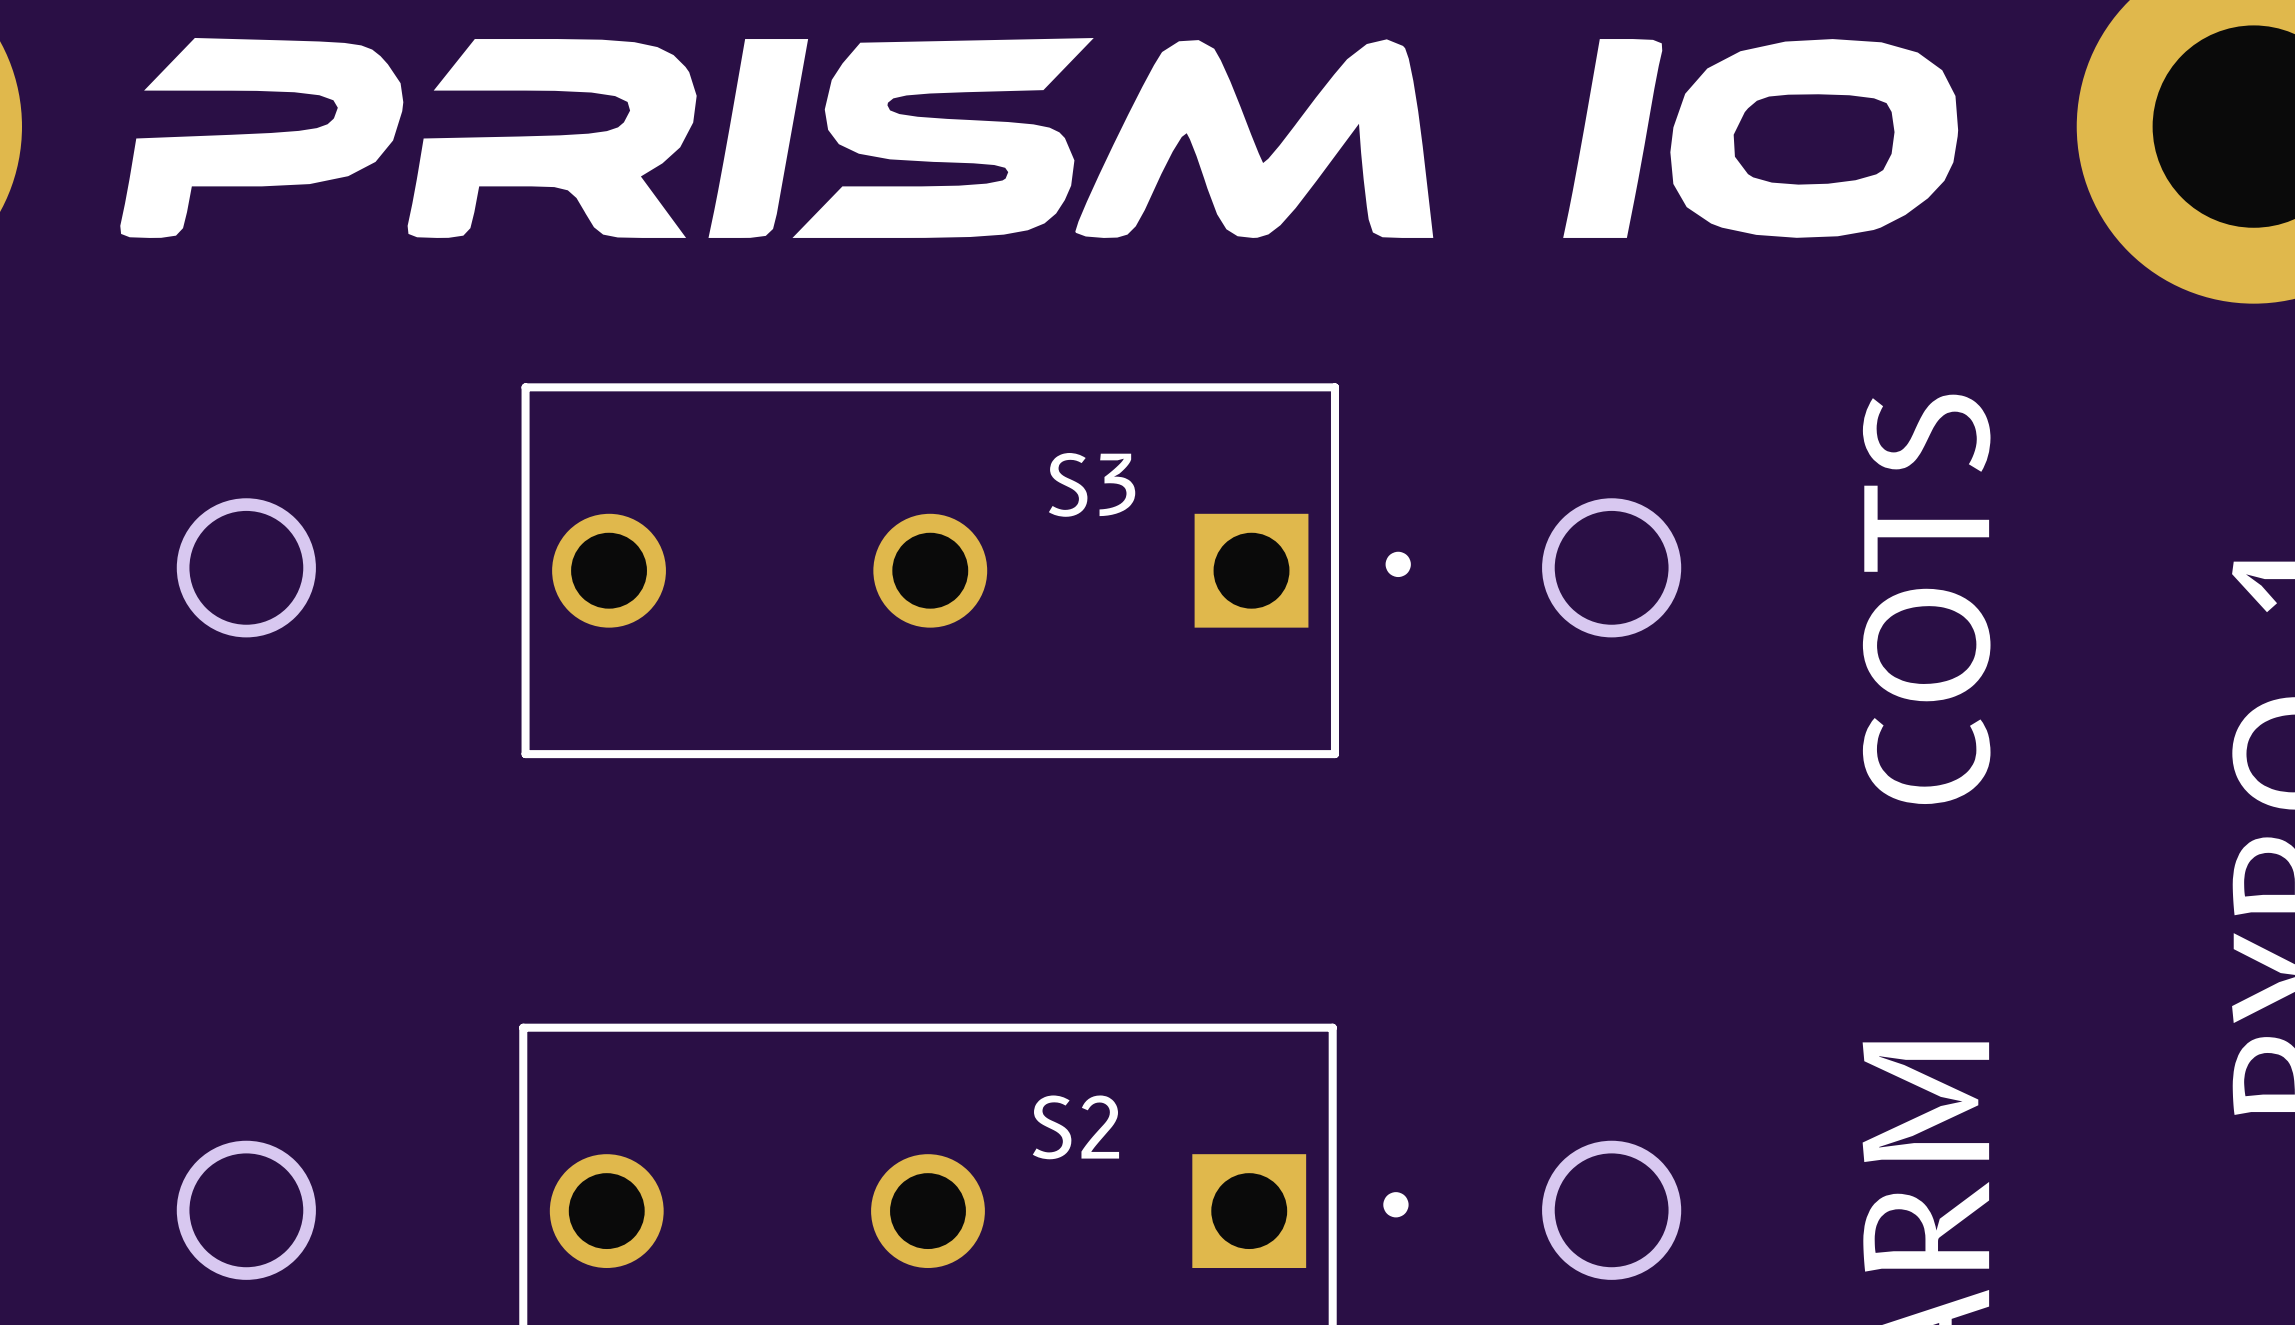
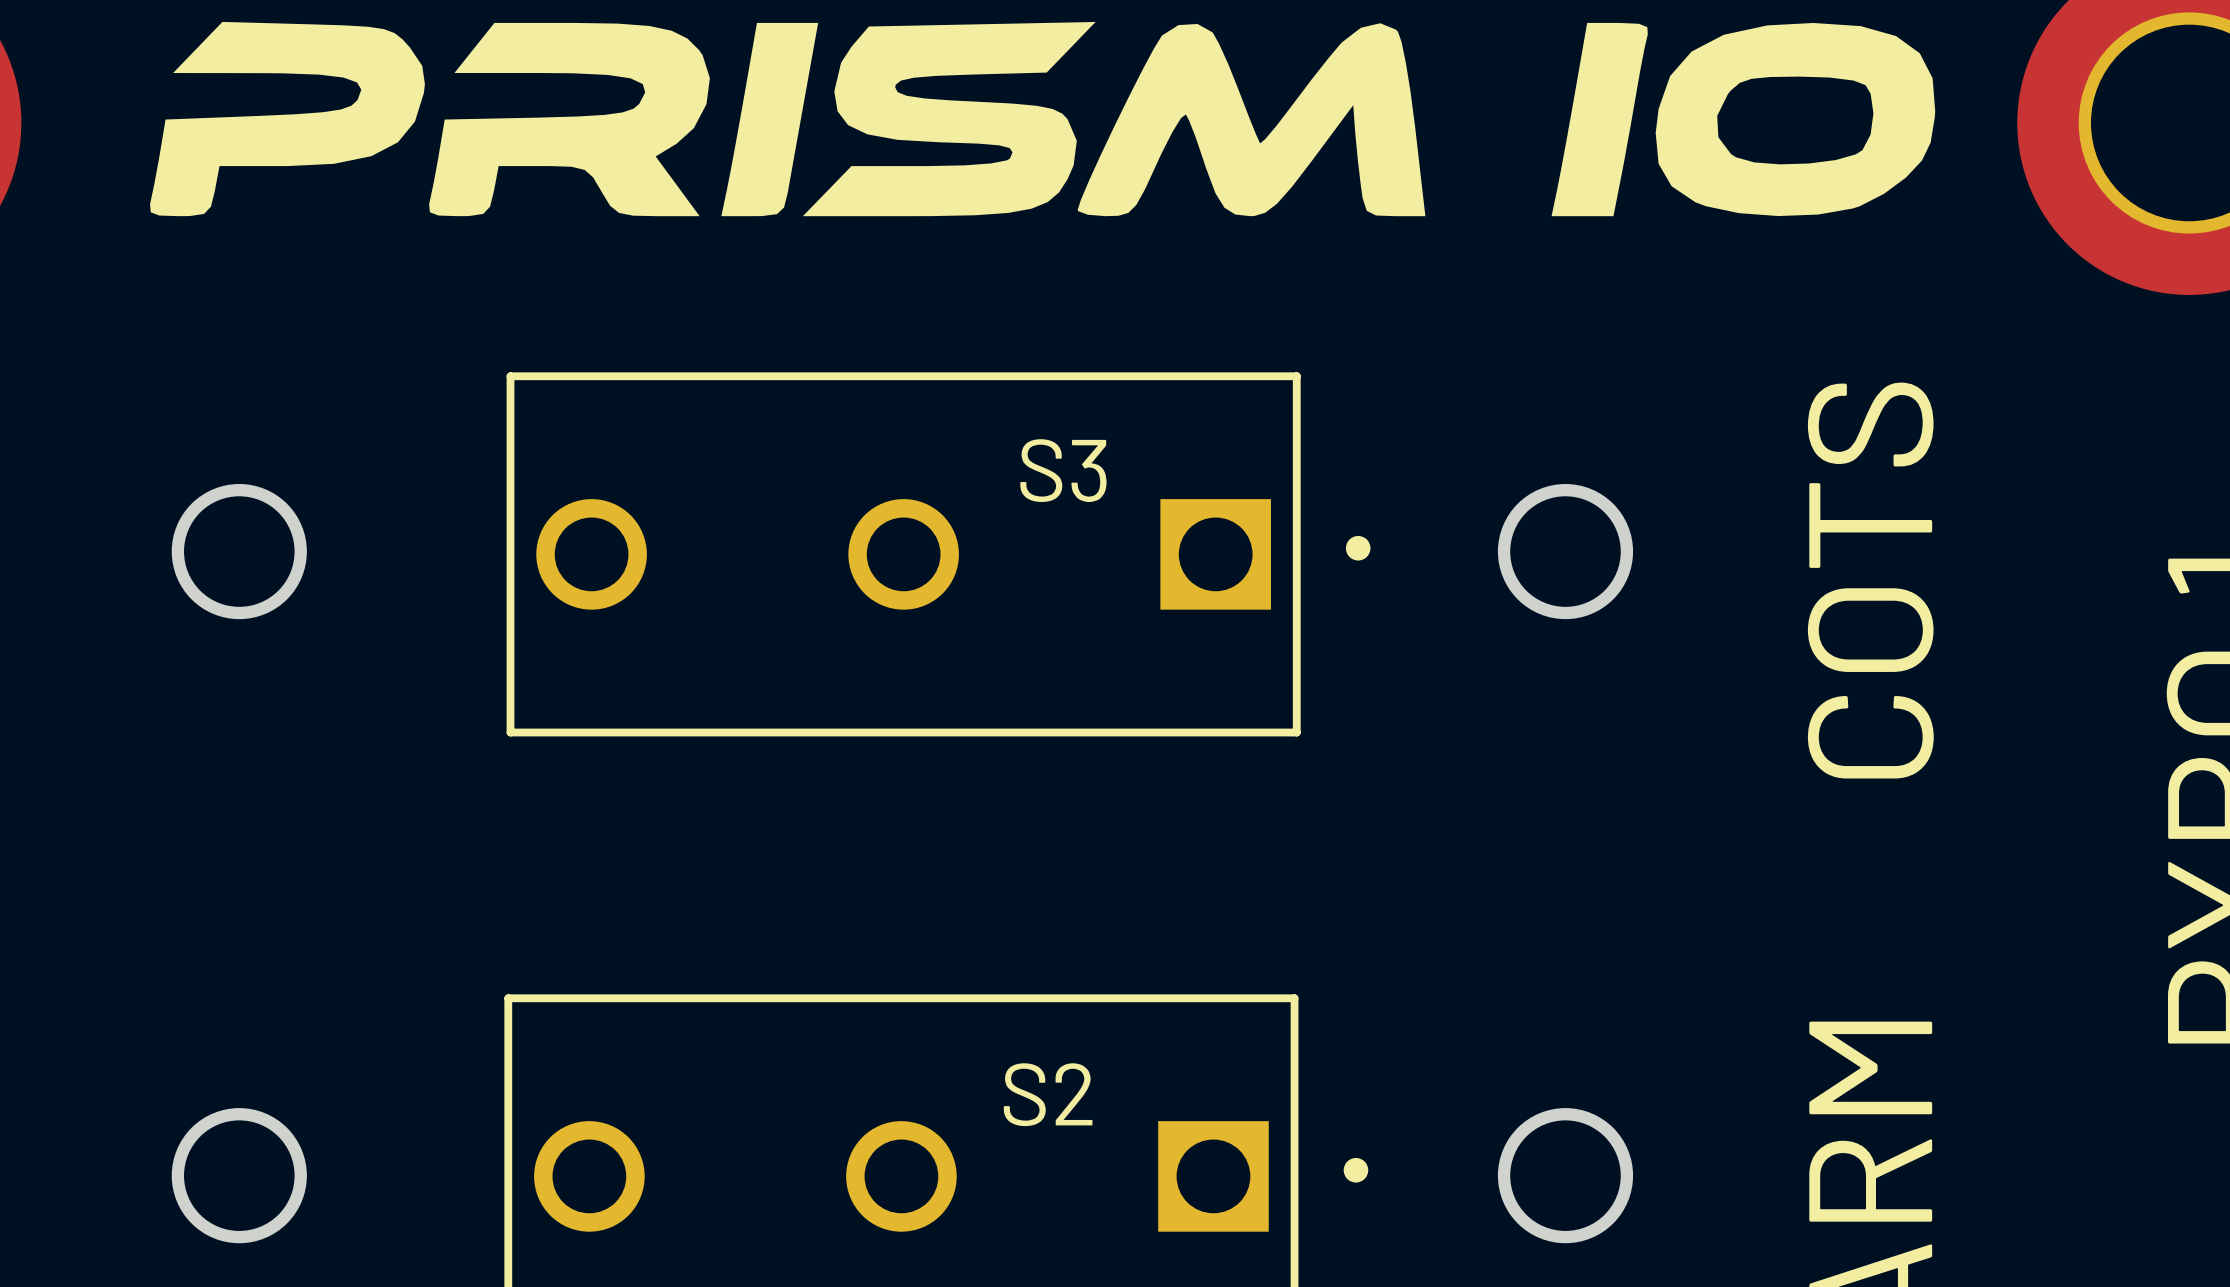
drawing position: (1039, 137) -> (1042, 119)

